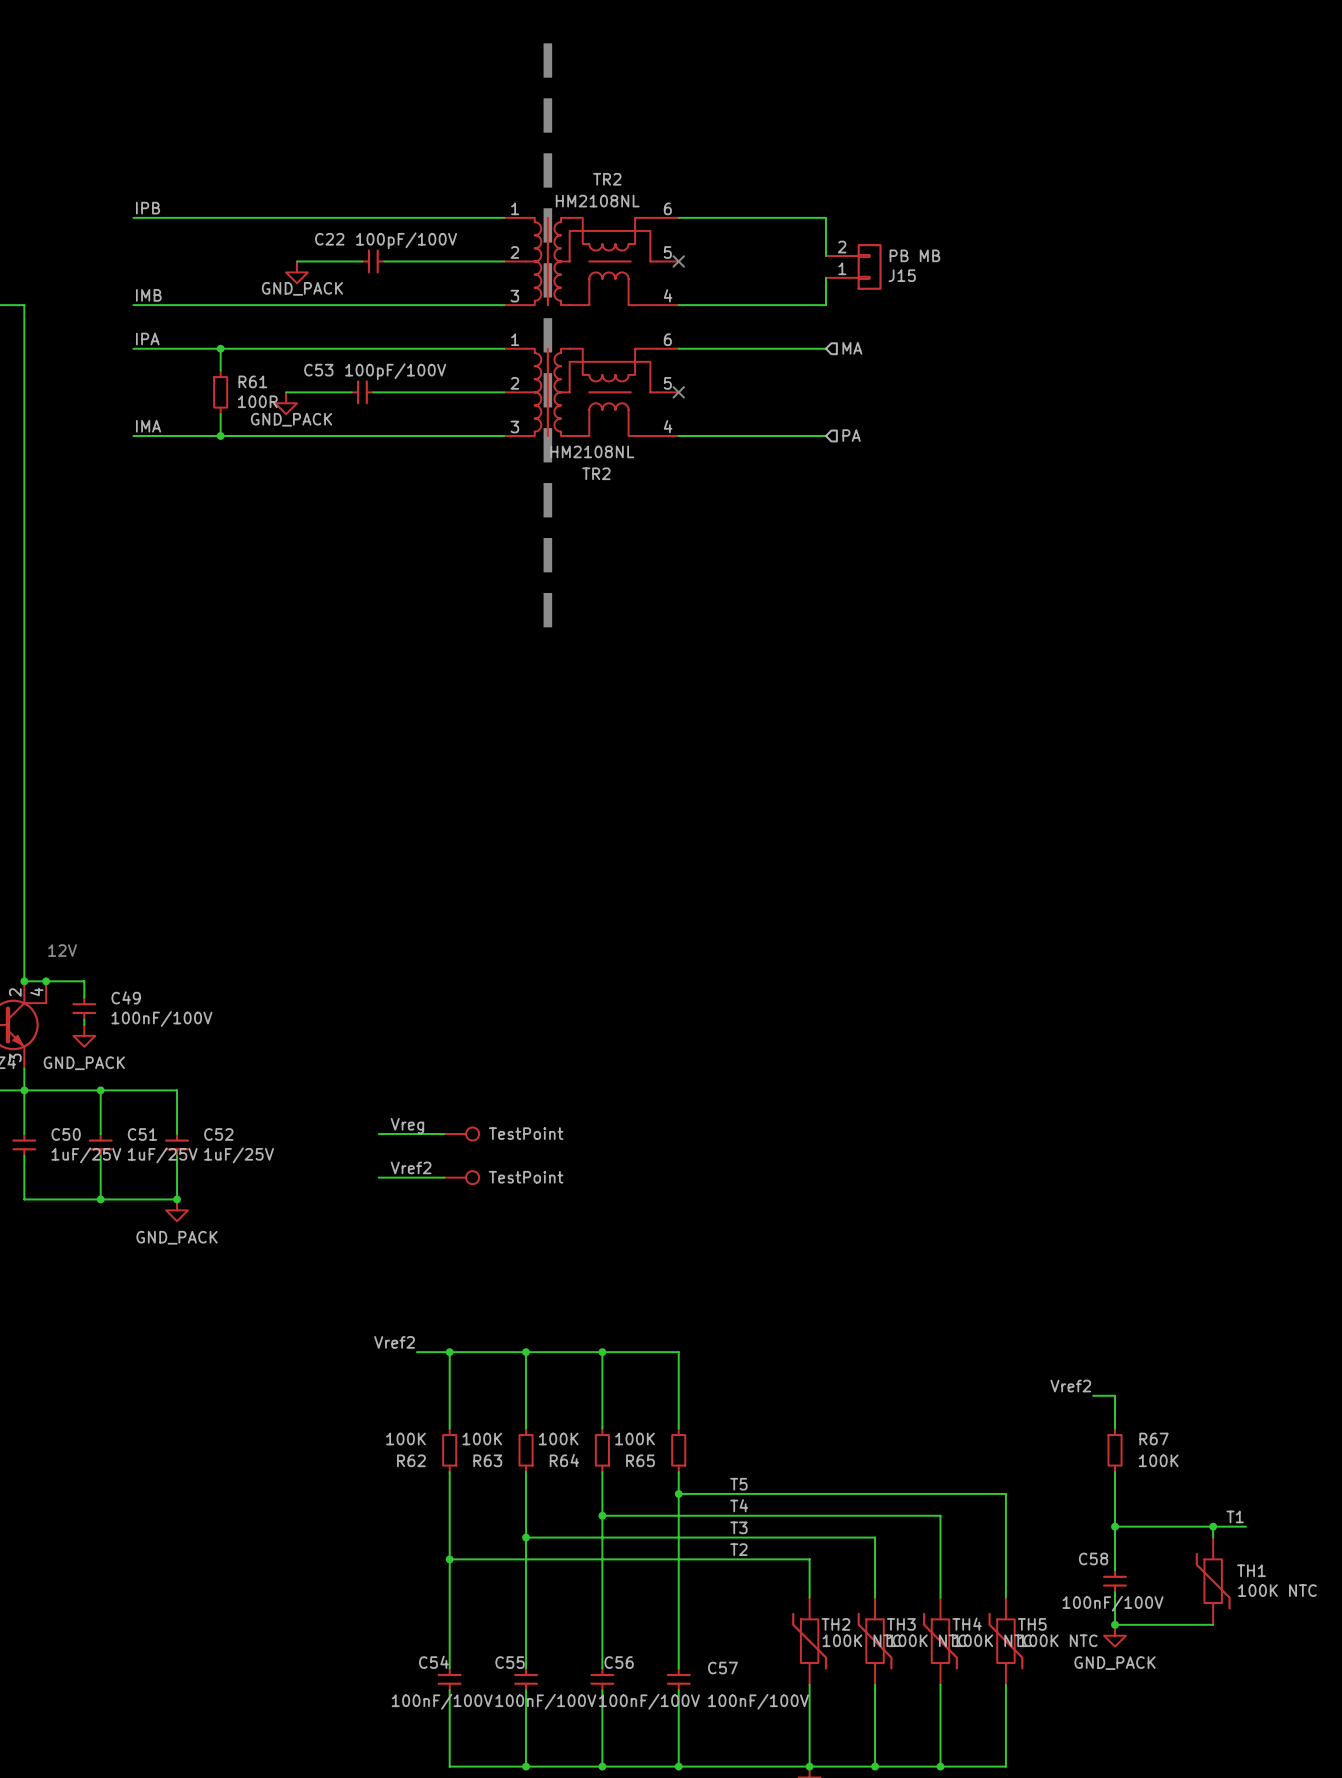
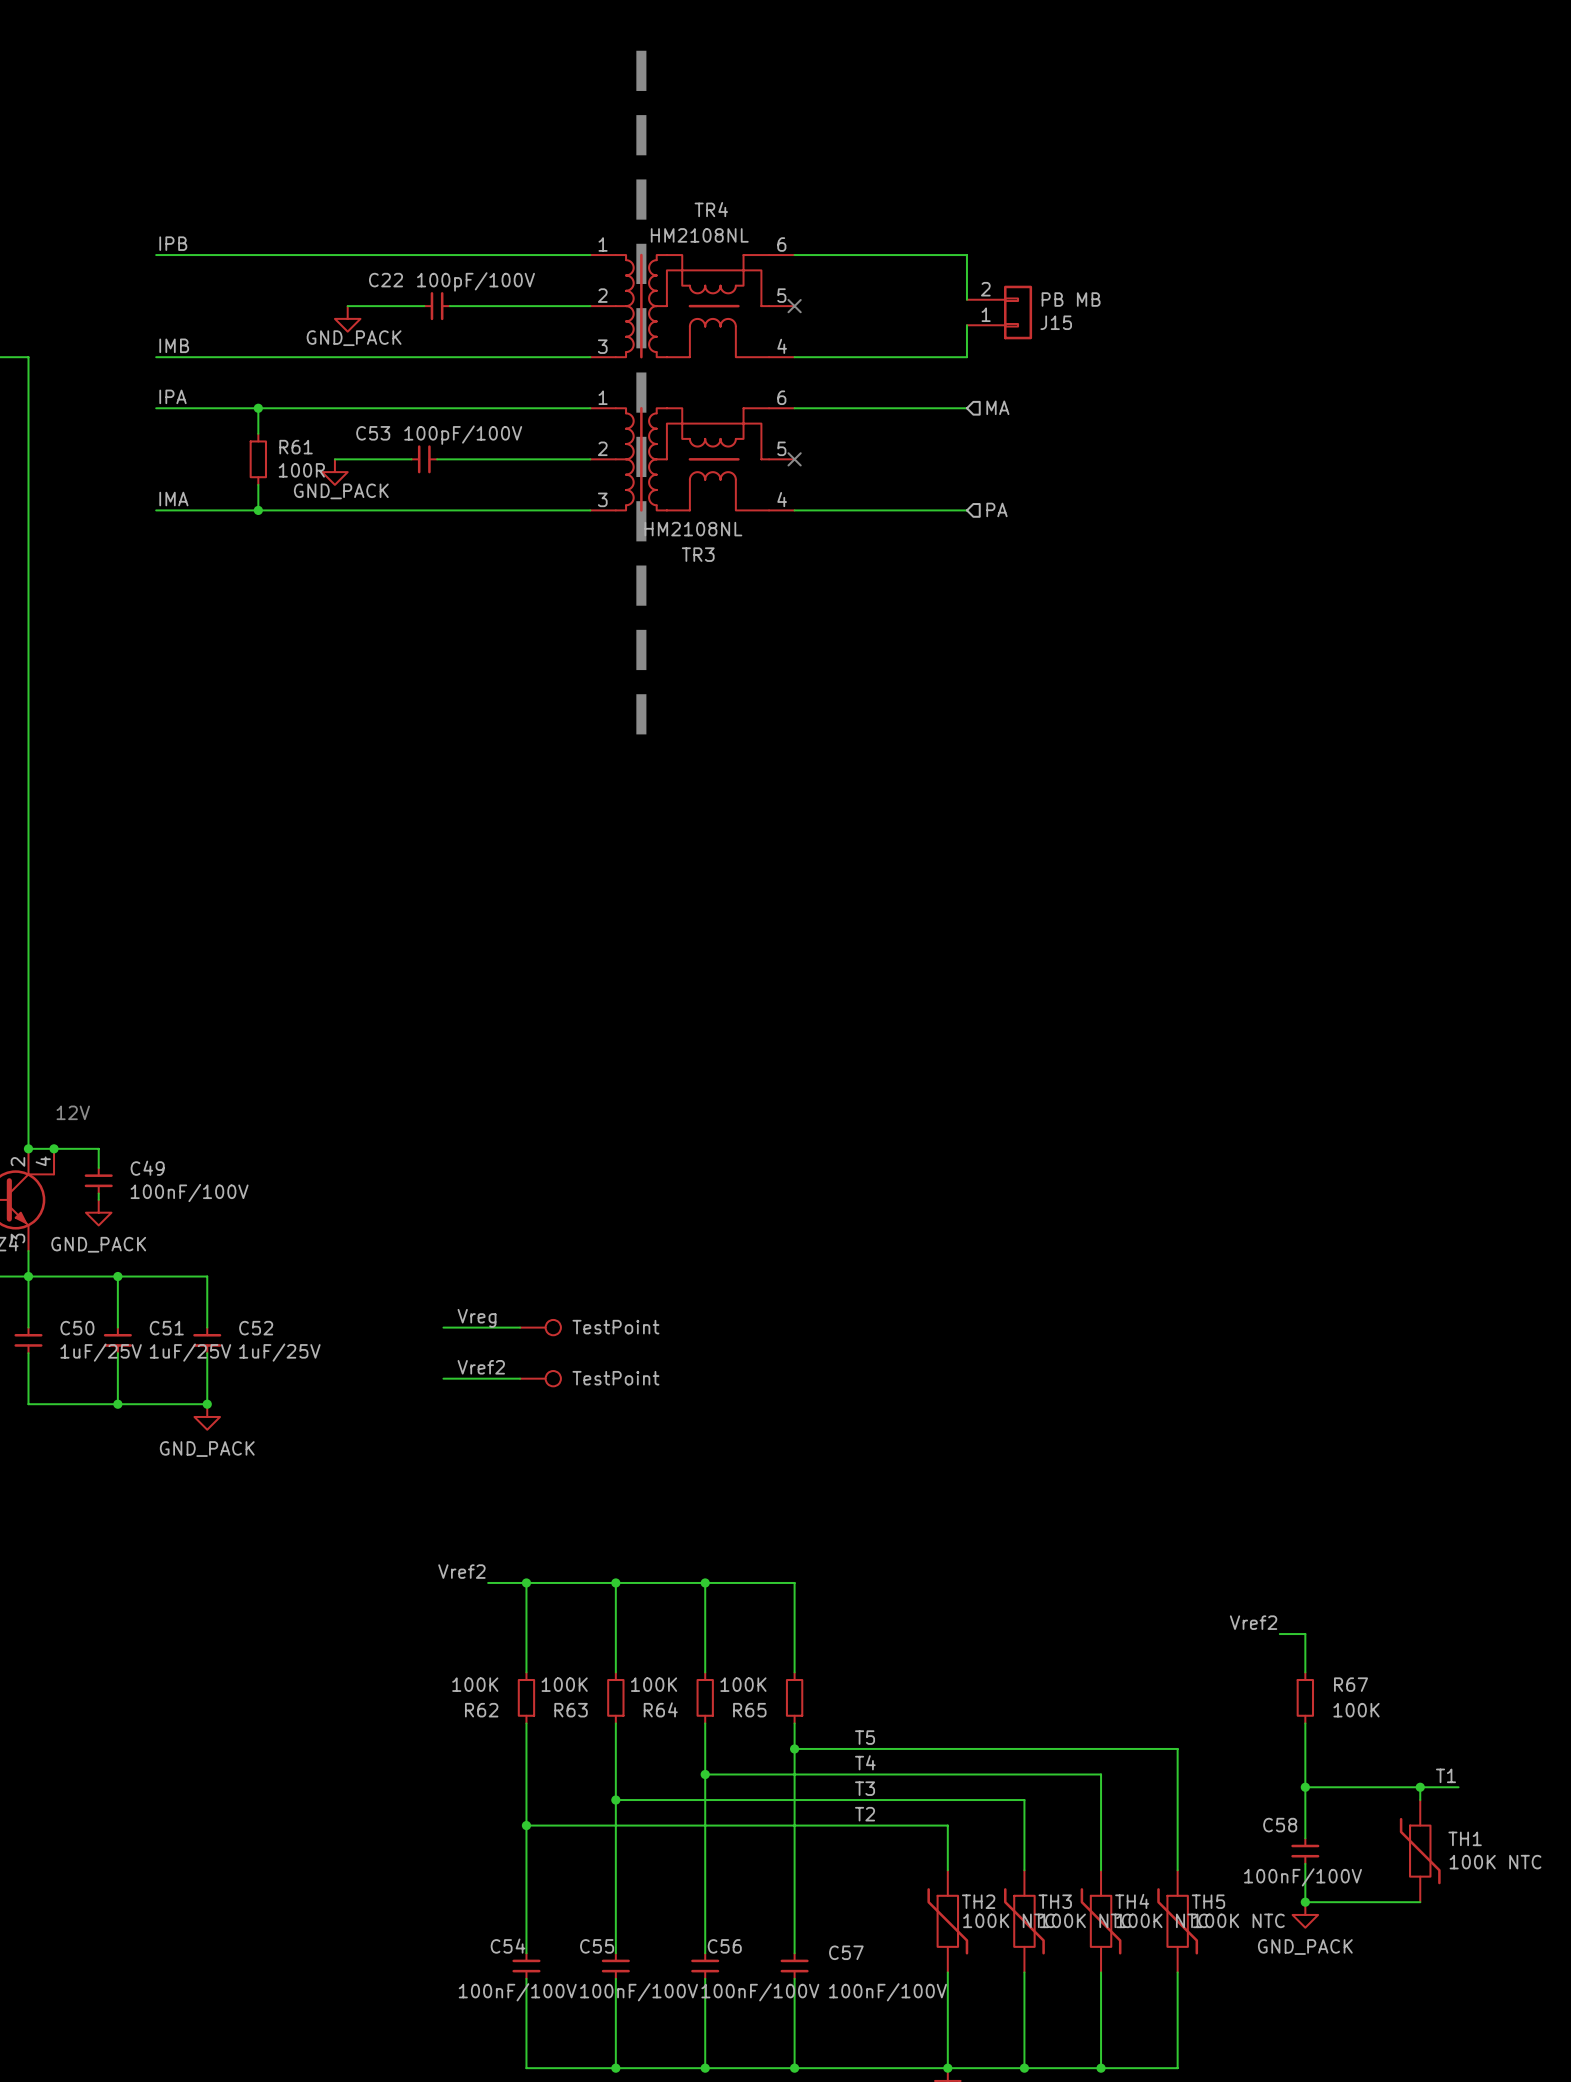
TR2 name: TR2 (607, 179) -> TR4 (711, 209)
TR2 name: TR2 (596, 473) -> TR3 (698, 554)

